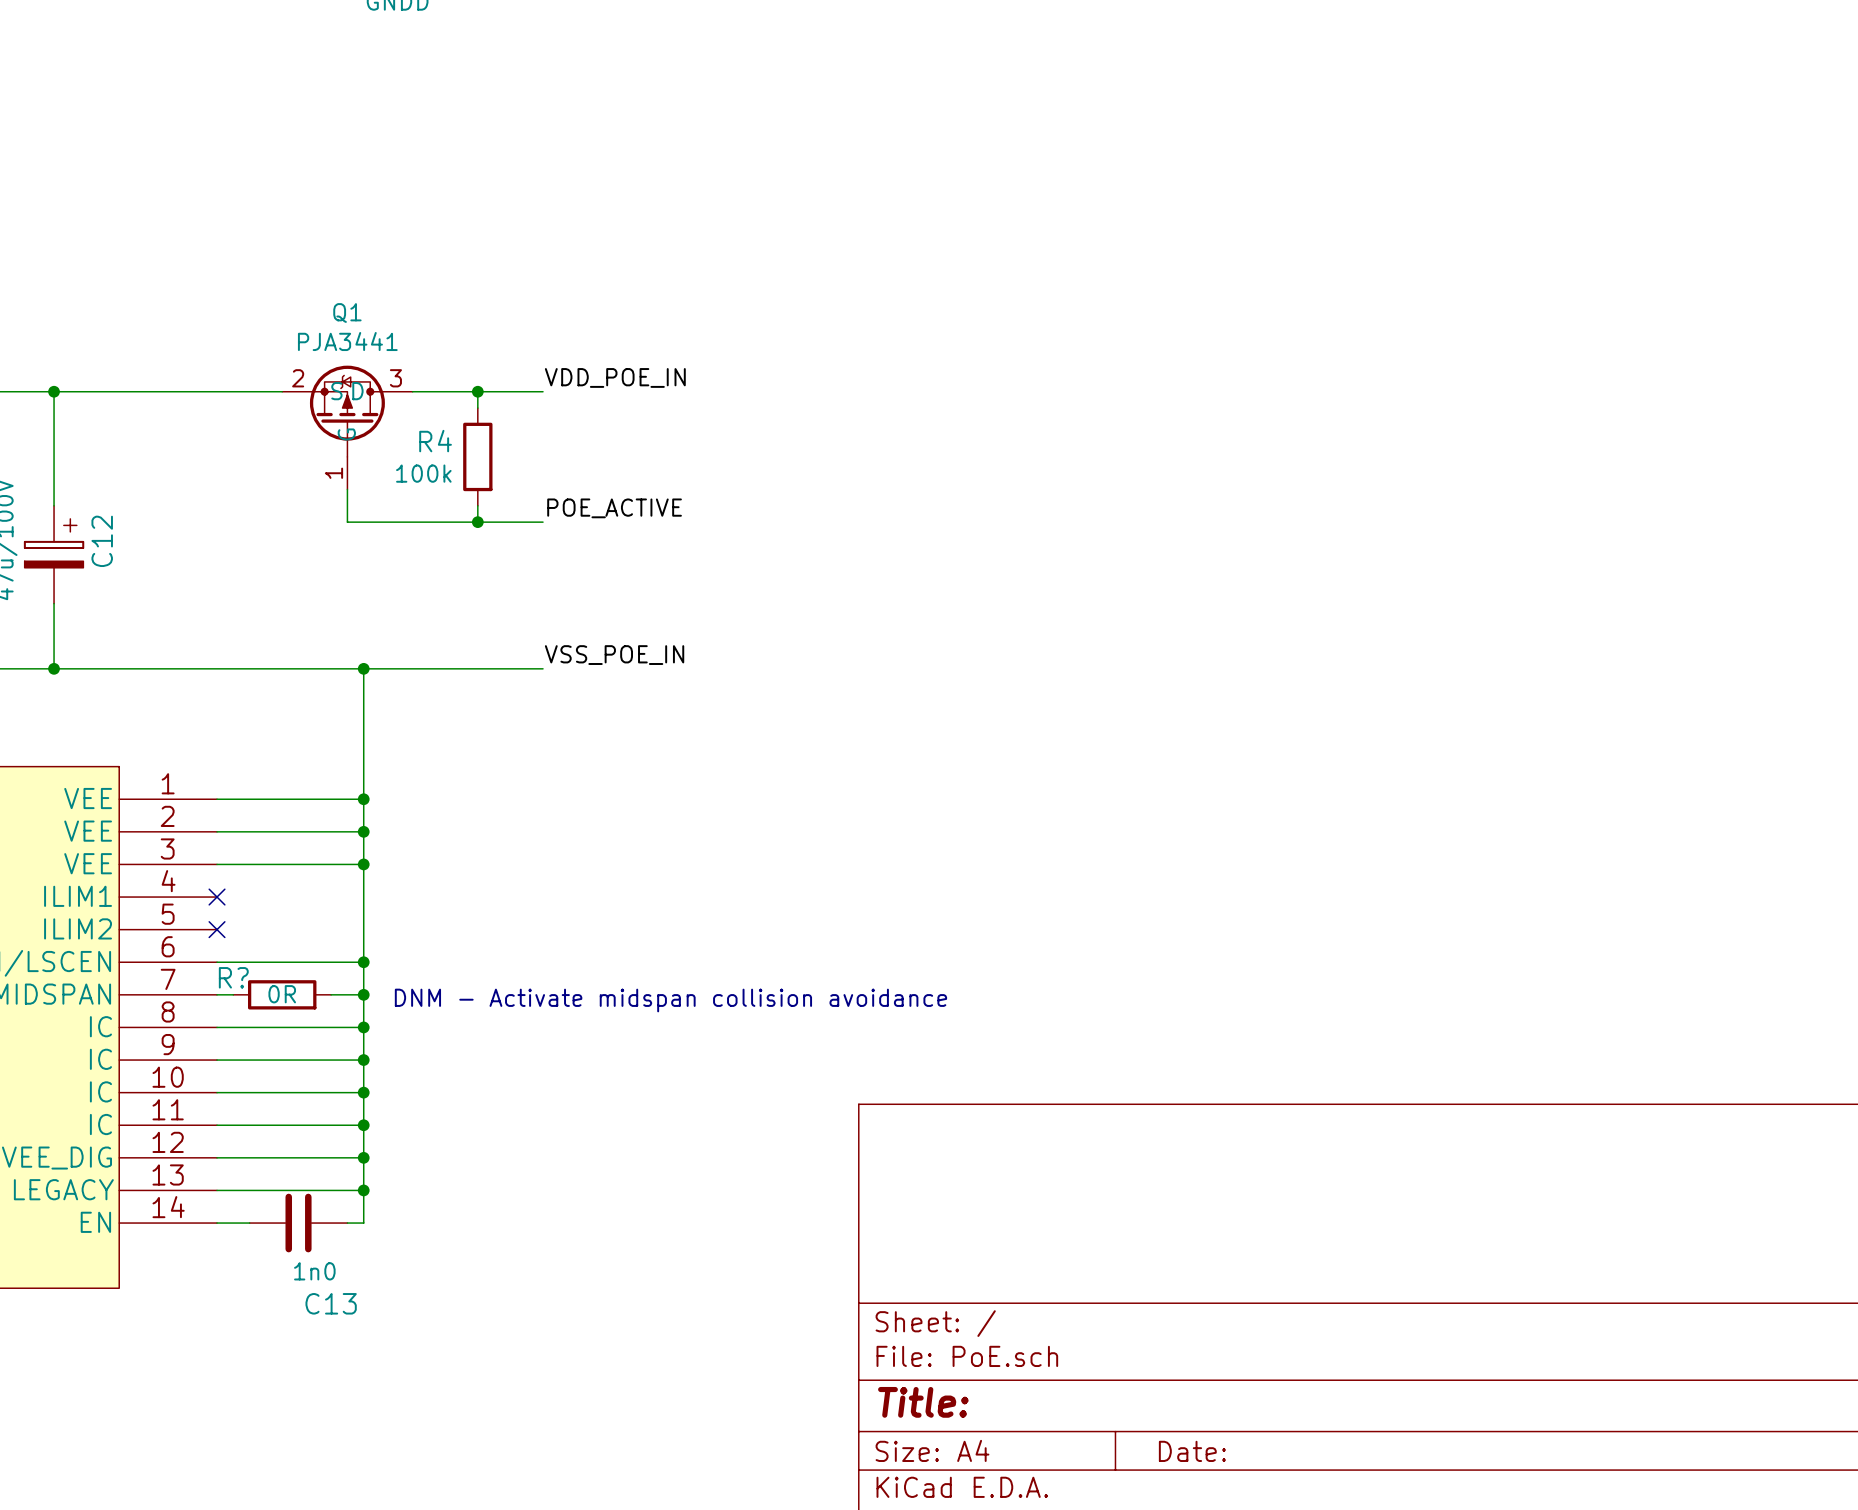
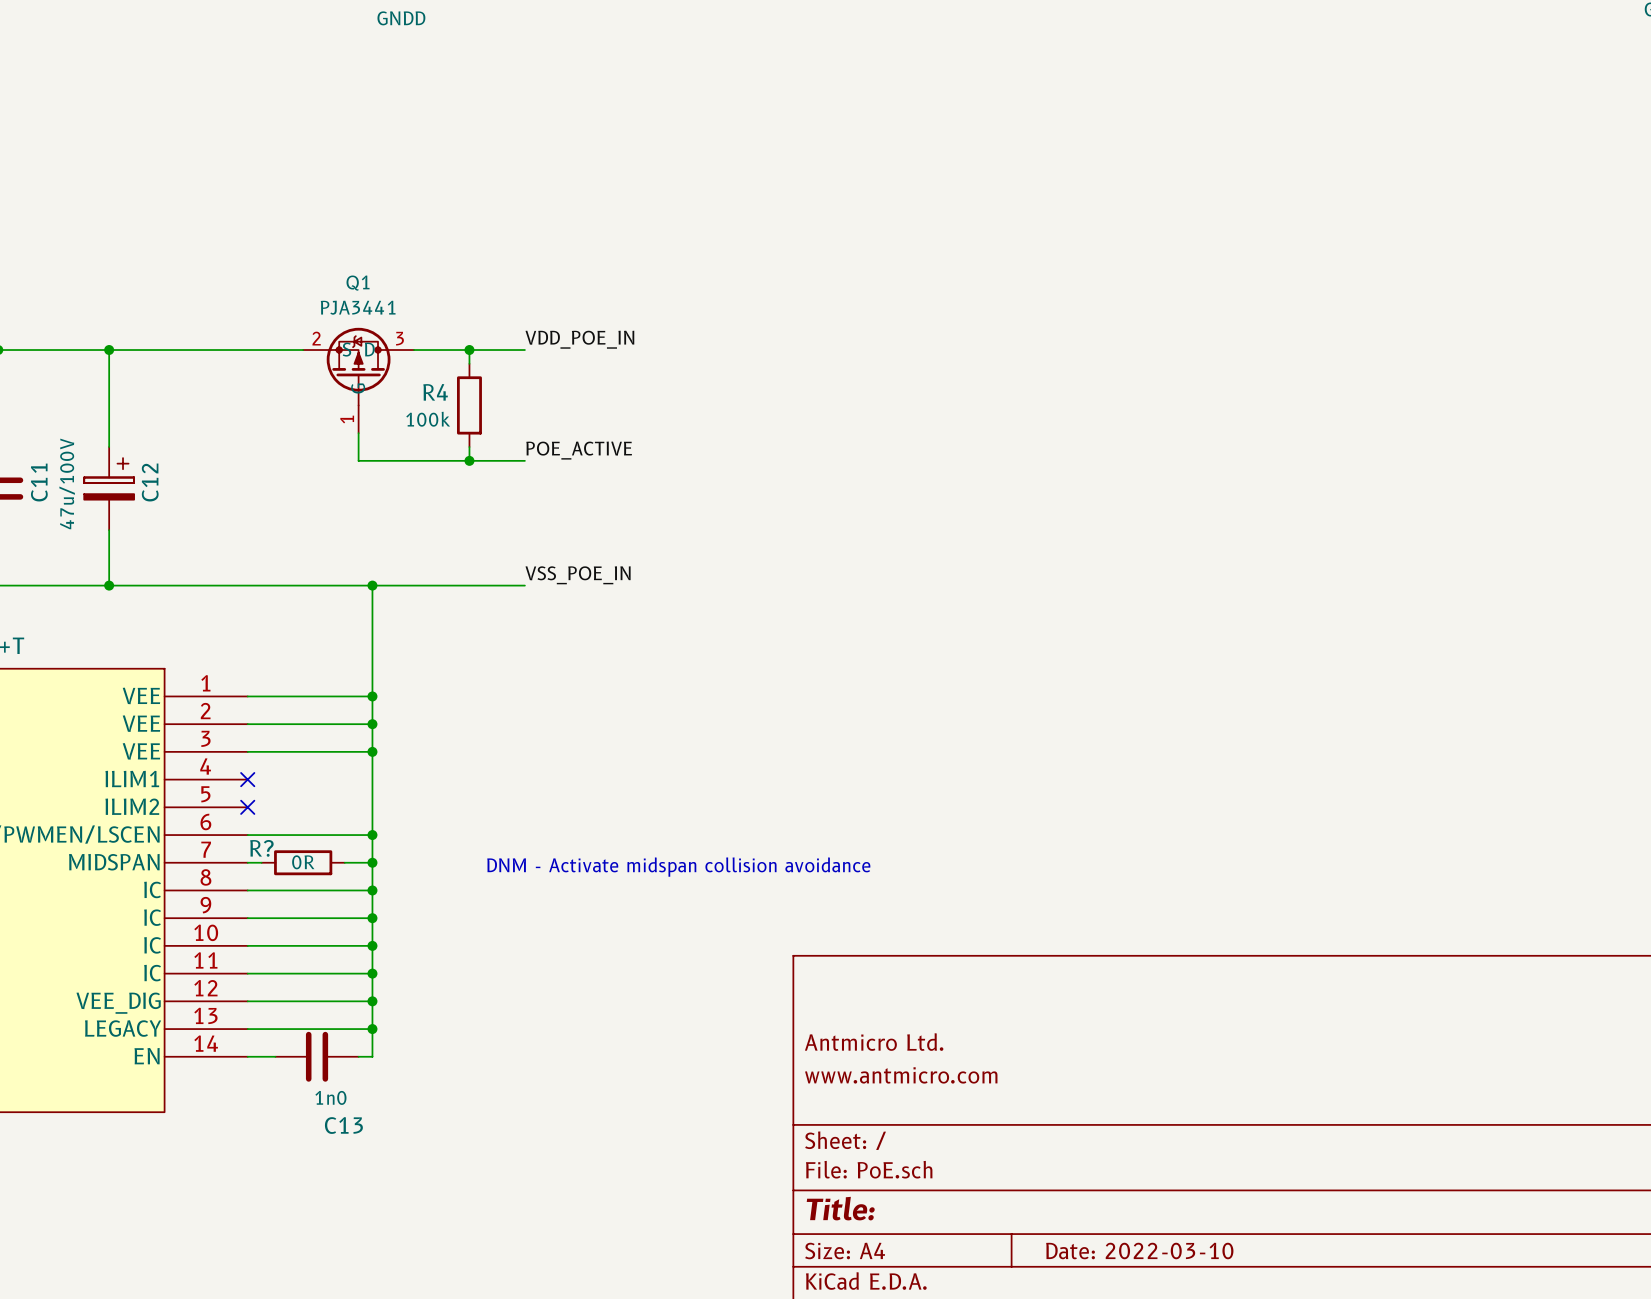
title block: none -> Antmicro Ltd. (874, 1042)
title block: none -> www.antmicro.com (901, 1075)
title block: Date: (1192, 1451) -> Date: 2022-03-10 (1139, 1250)

